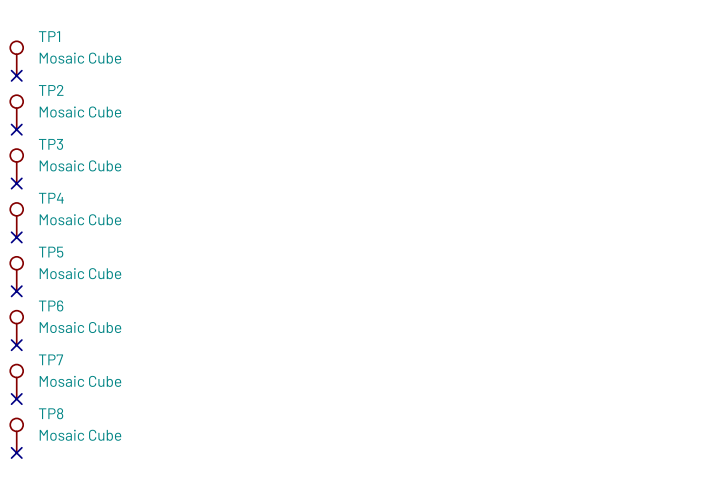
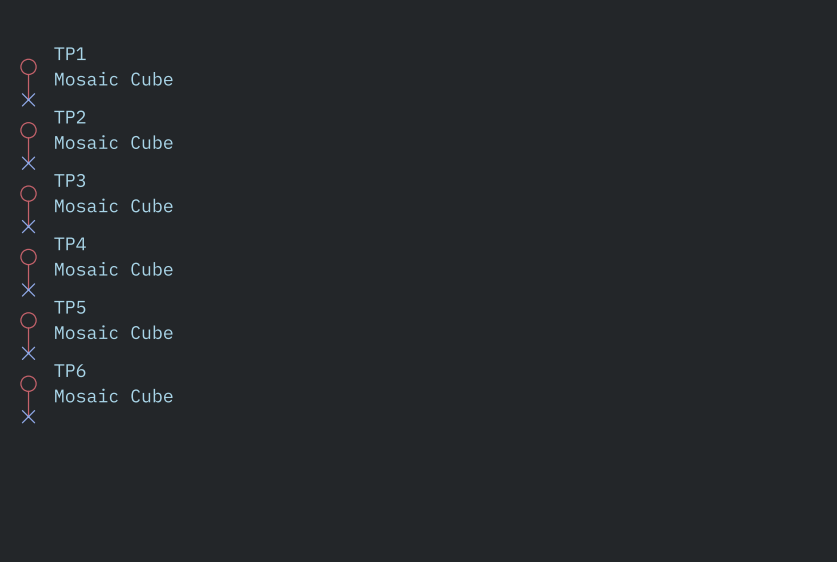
TP7: Mosaic Cube (16, 381) -> none
no-connect mark: (16, 399) -> none
TP8: Mosaic Cube (16, 435) -> none
no-connect mark: (16, 452) -> none

